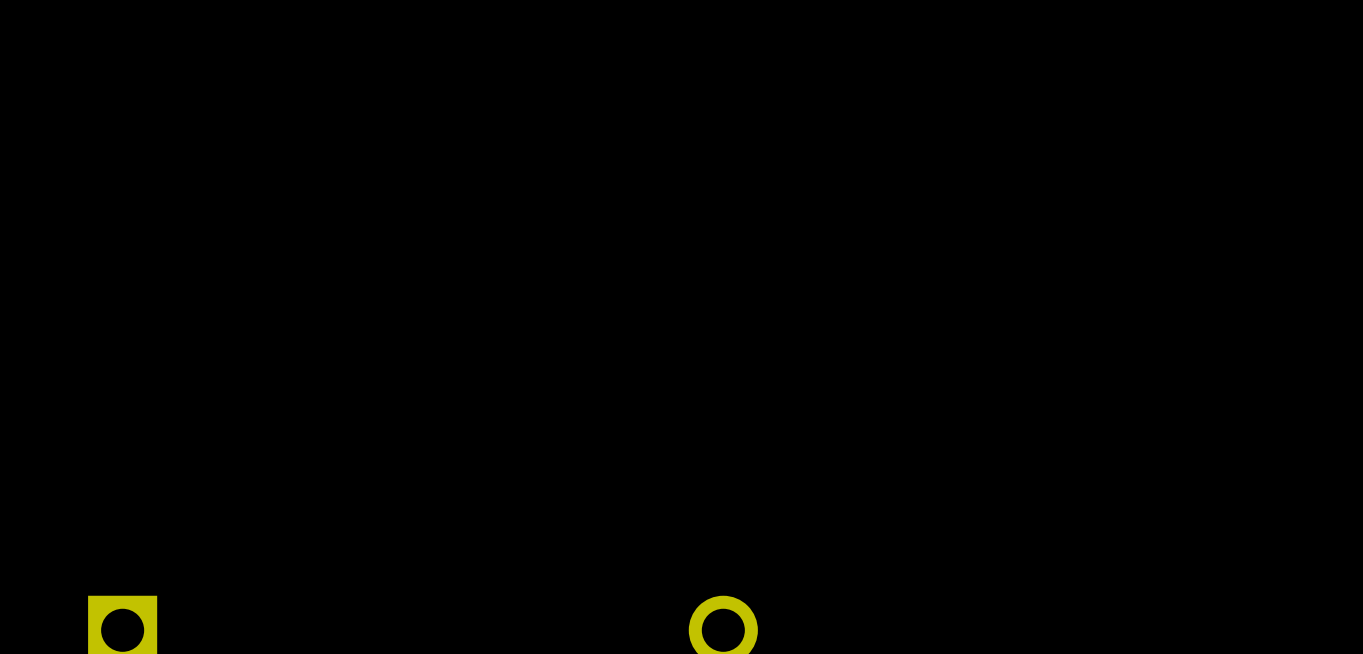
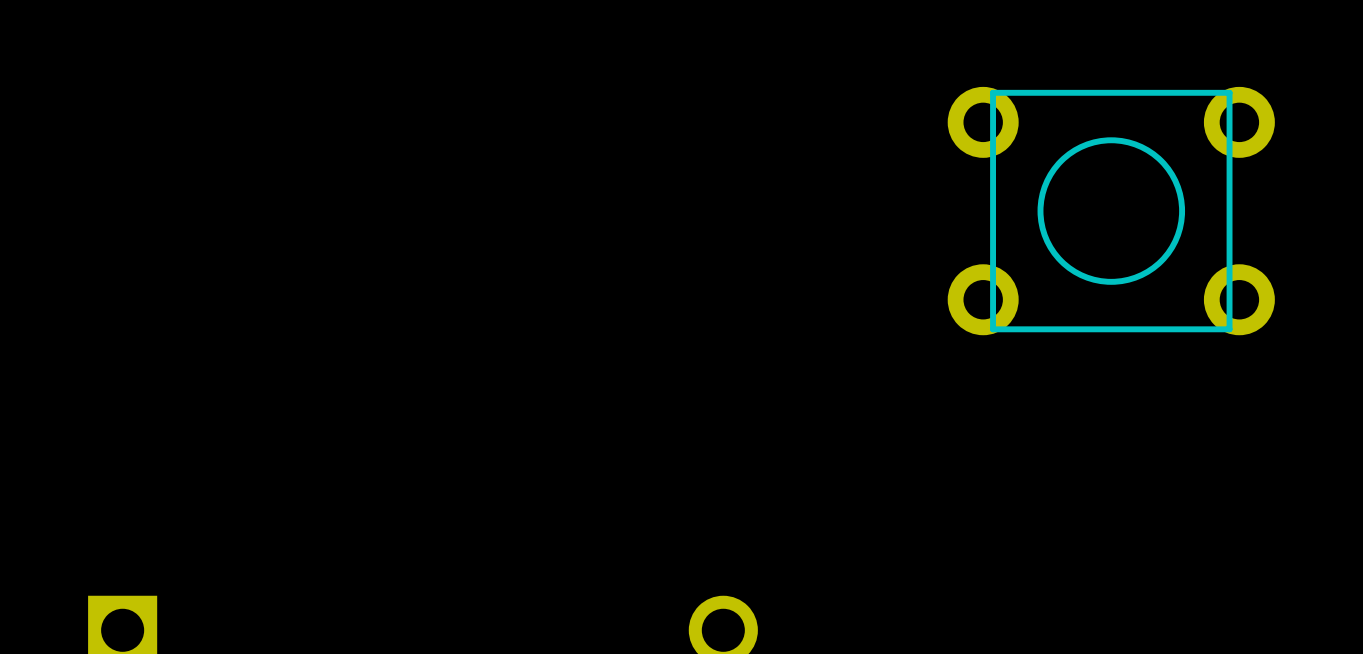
part: none -> (1111, 211)

